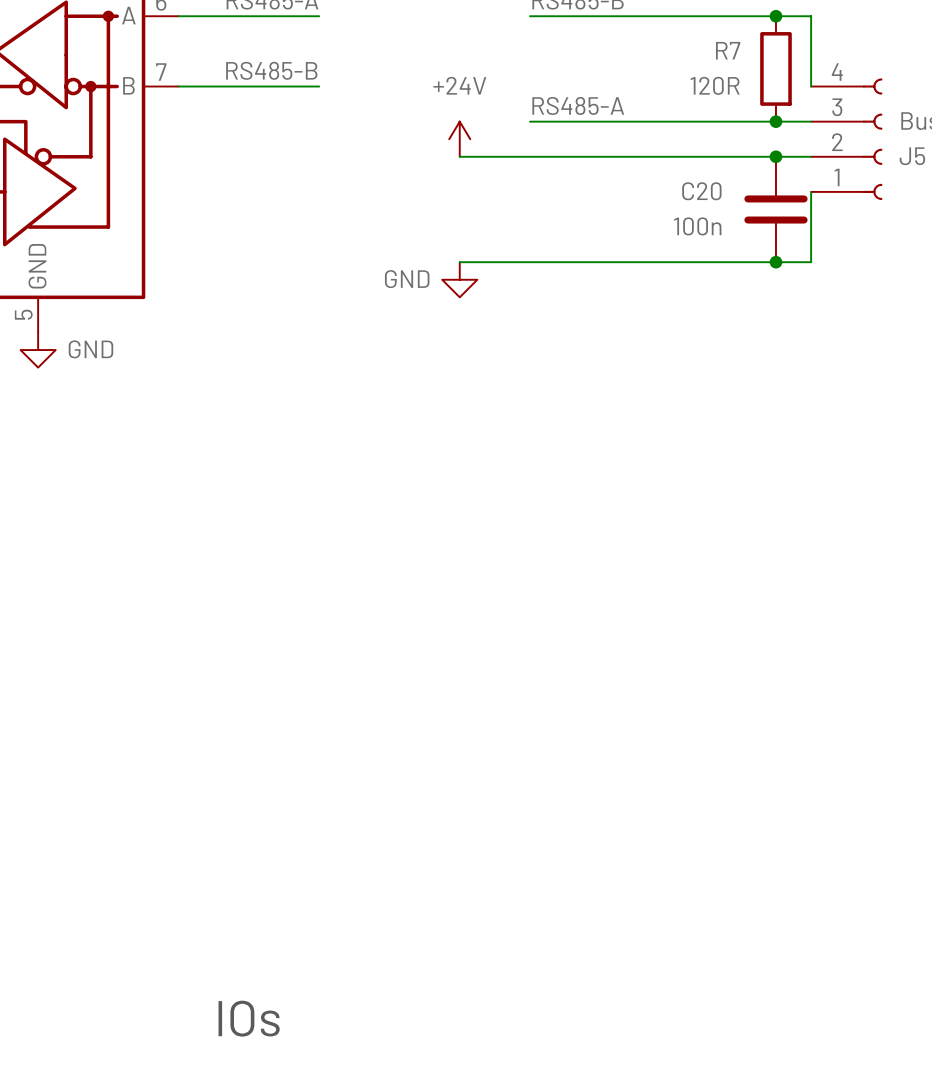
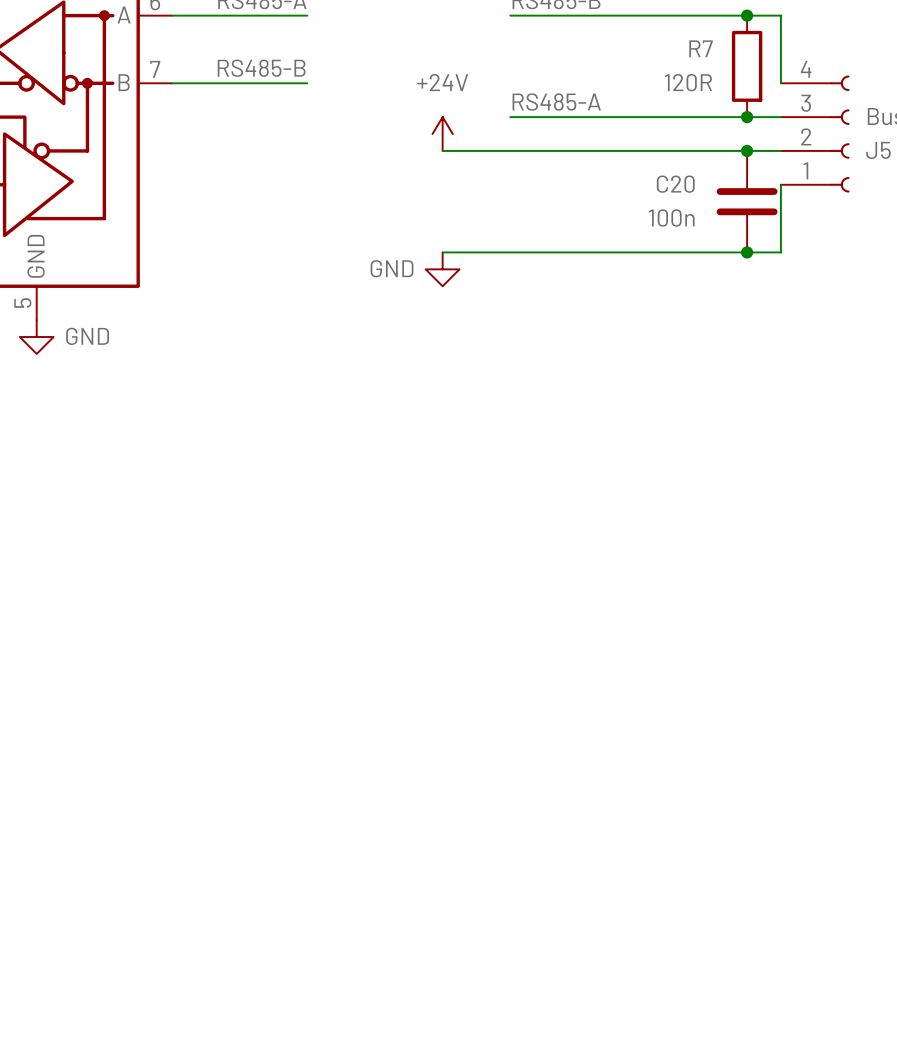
text: IOs (249, 1018) -> none

